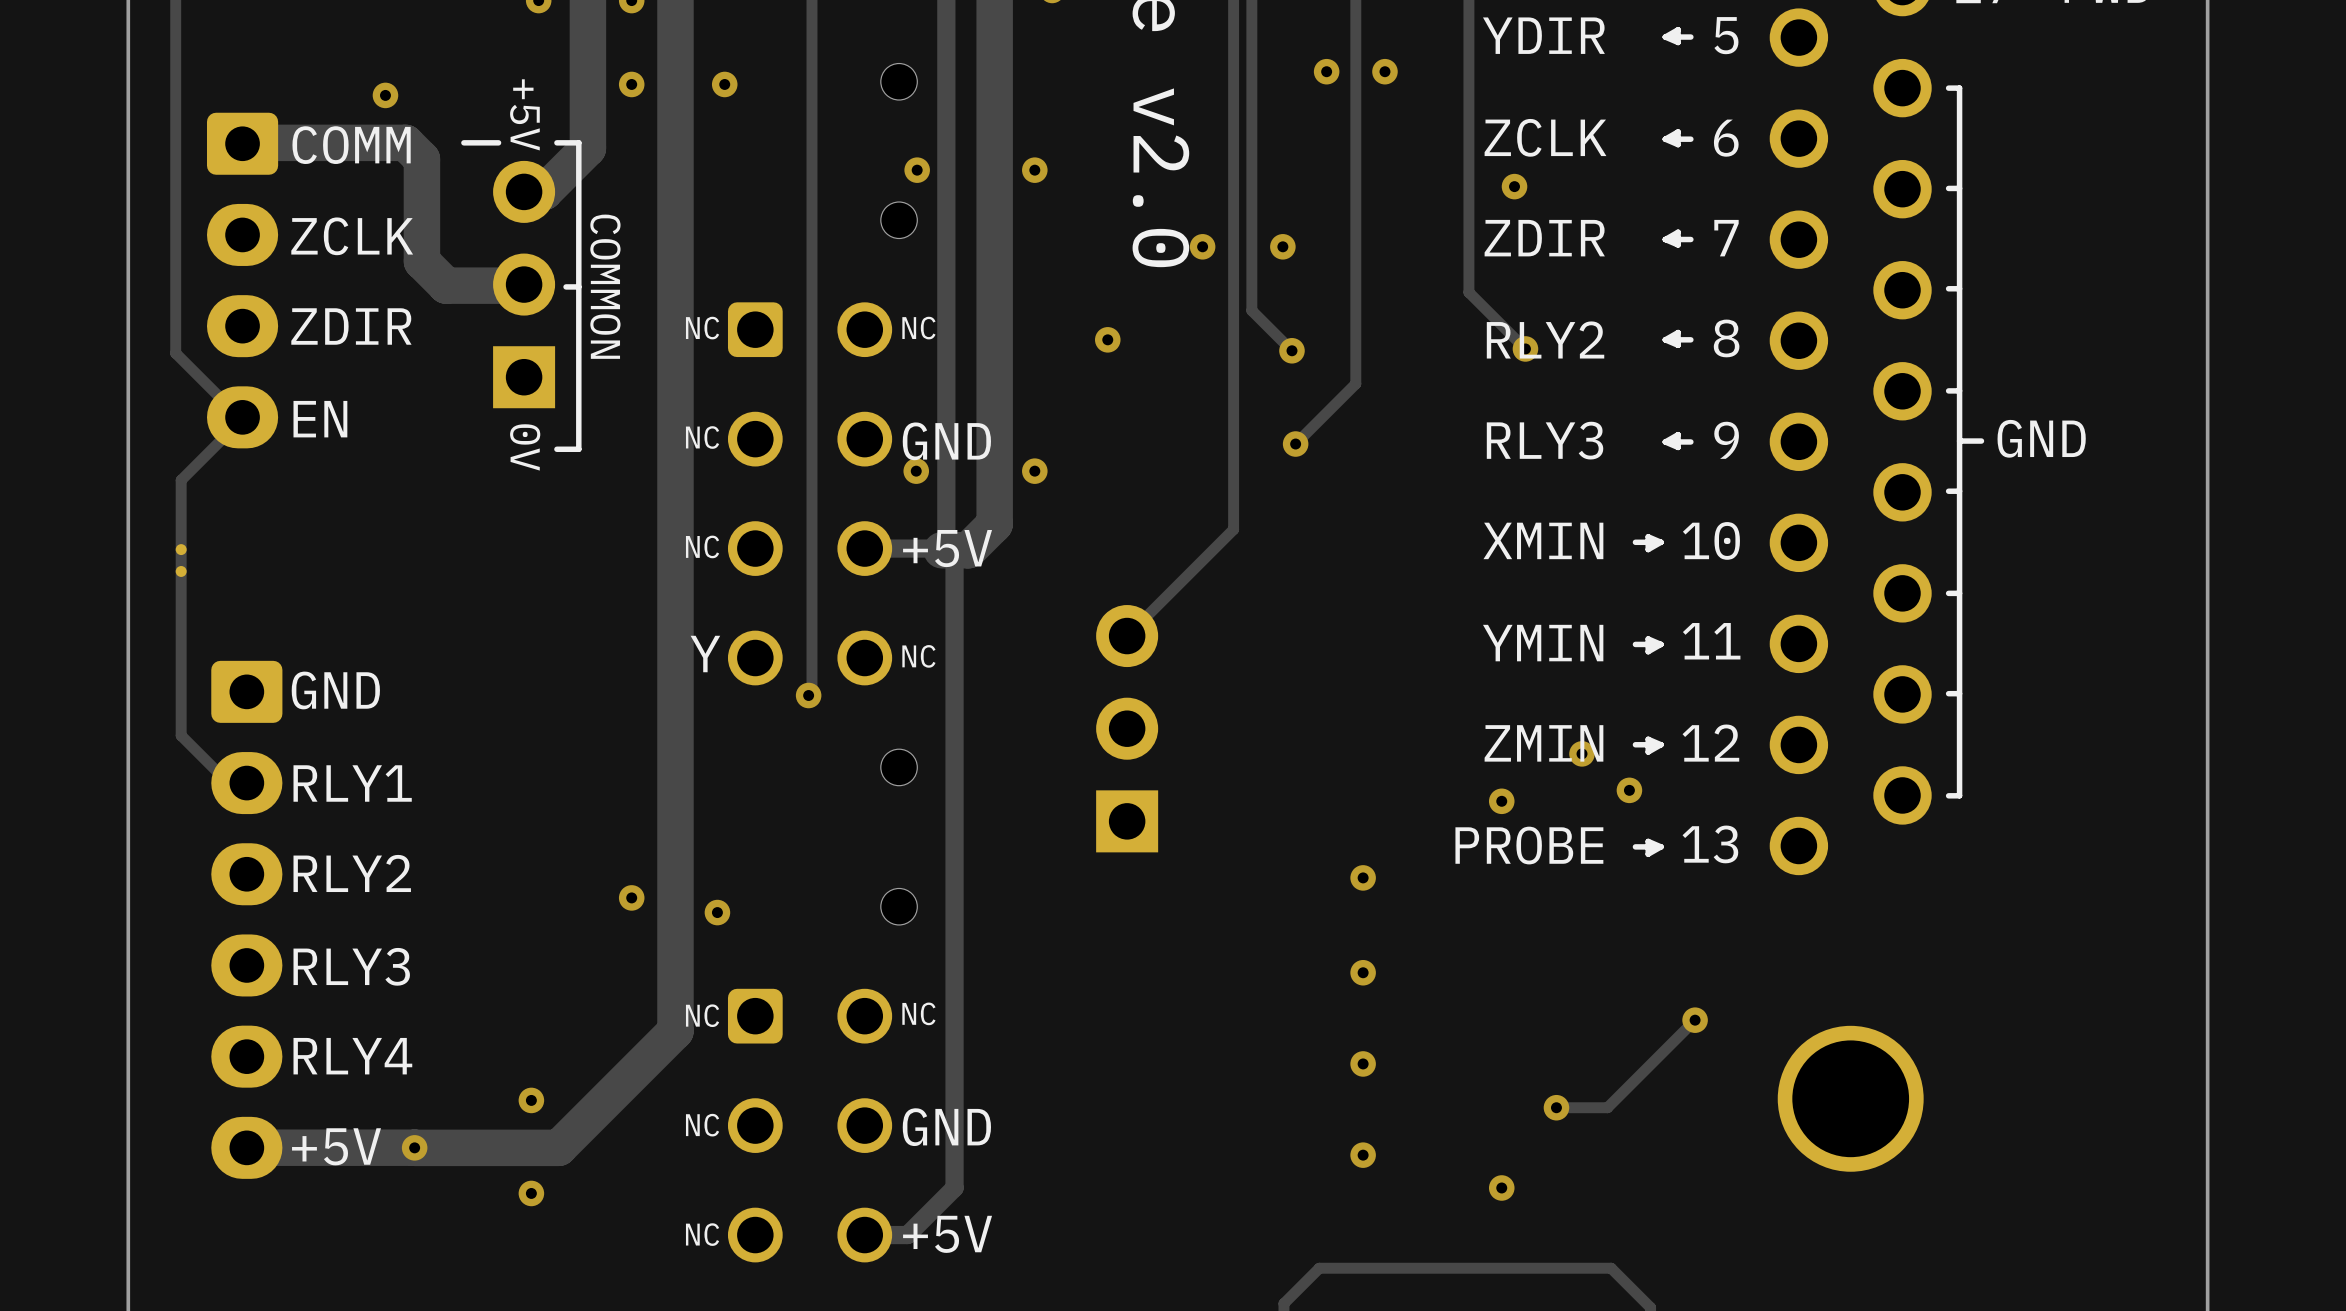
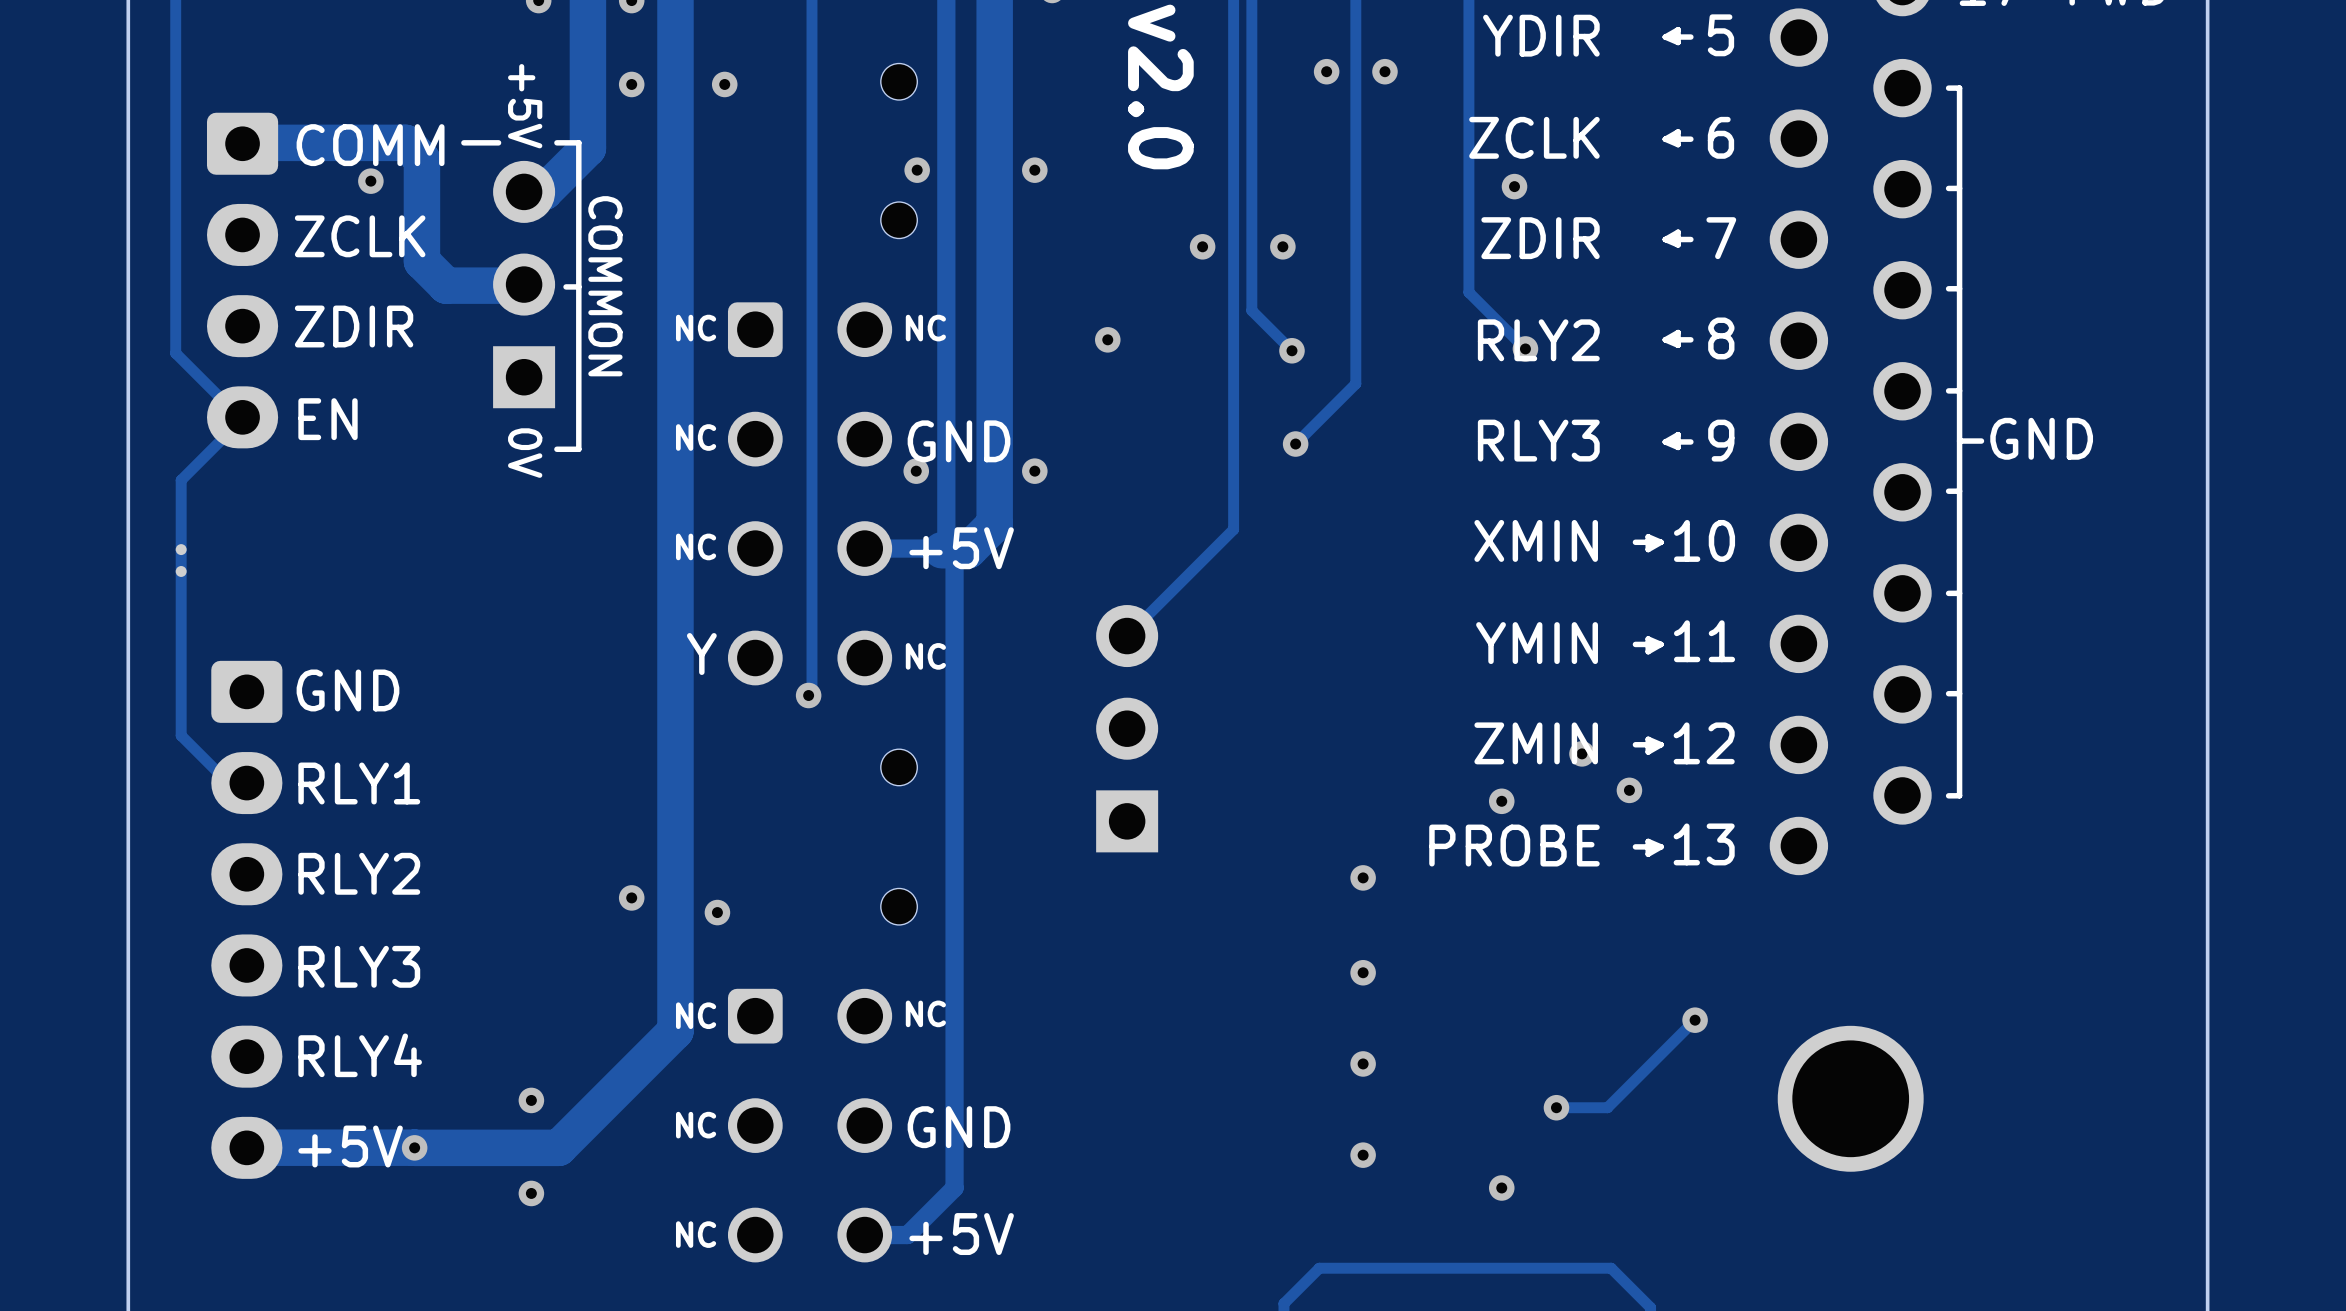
via position: (385, 95) -> (370, 181)

